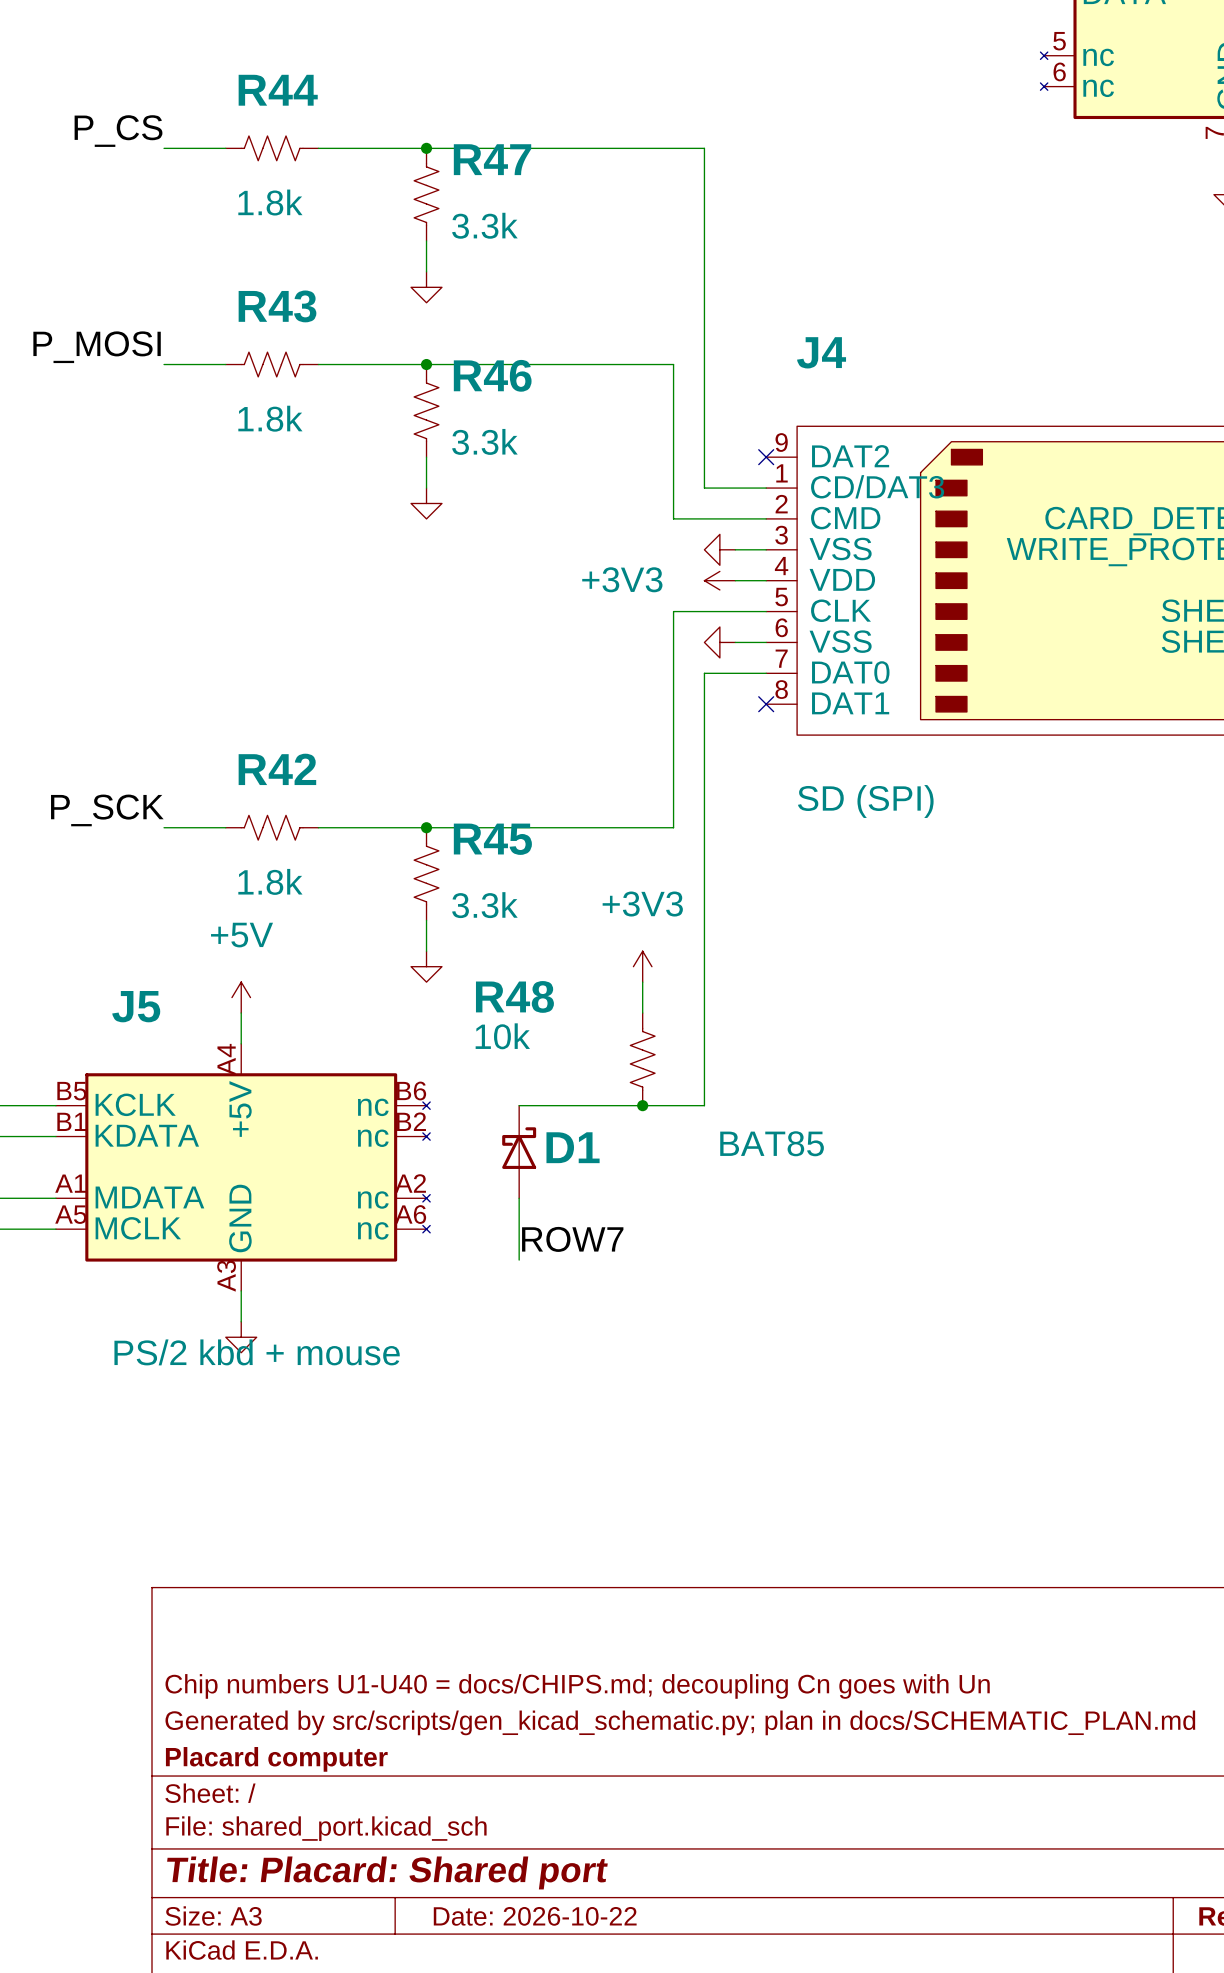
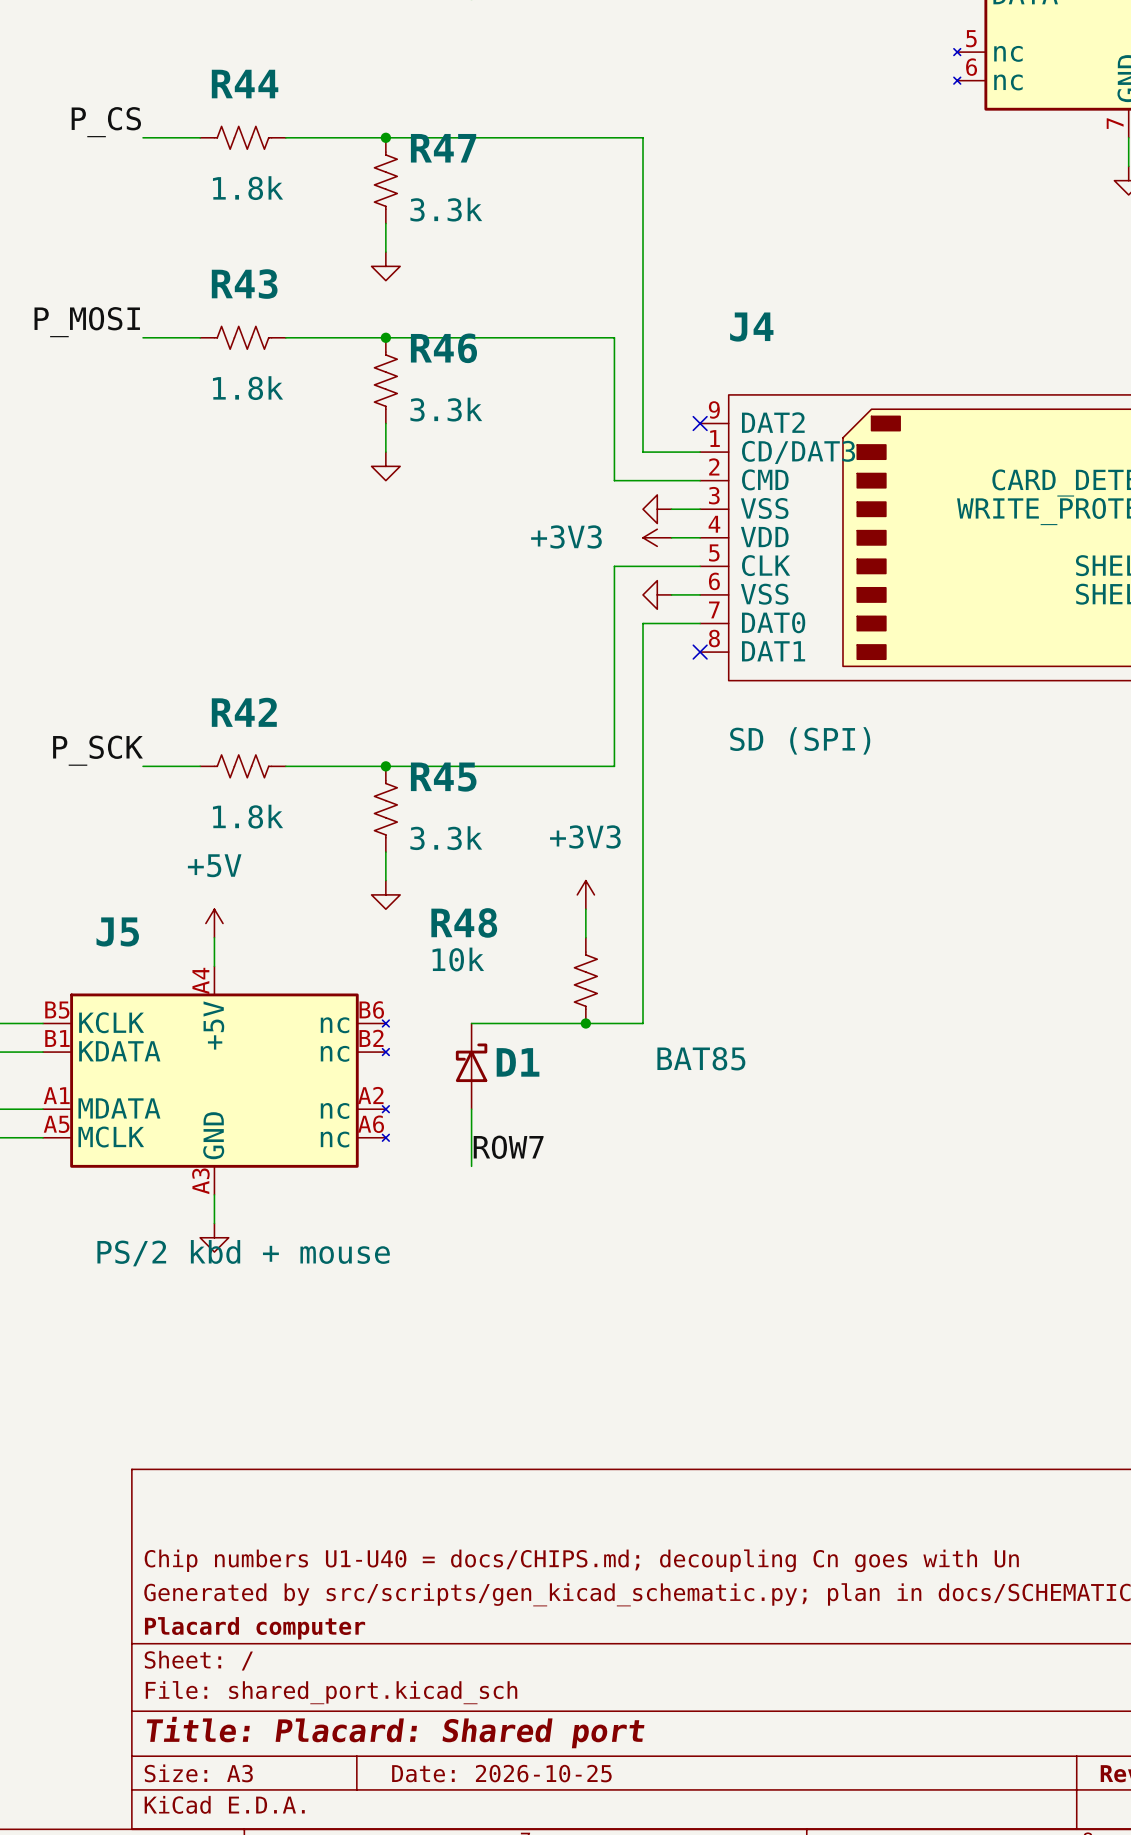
title block: Date: 2026-10-22 (535, 1916) -> Date: 2026-10-25 (501, 1773)

